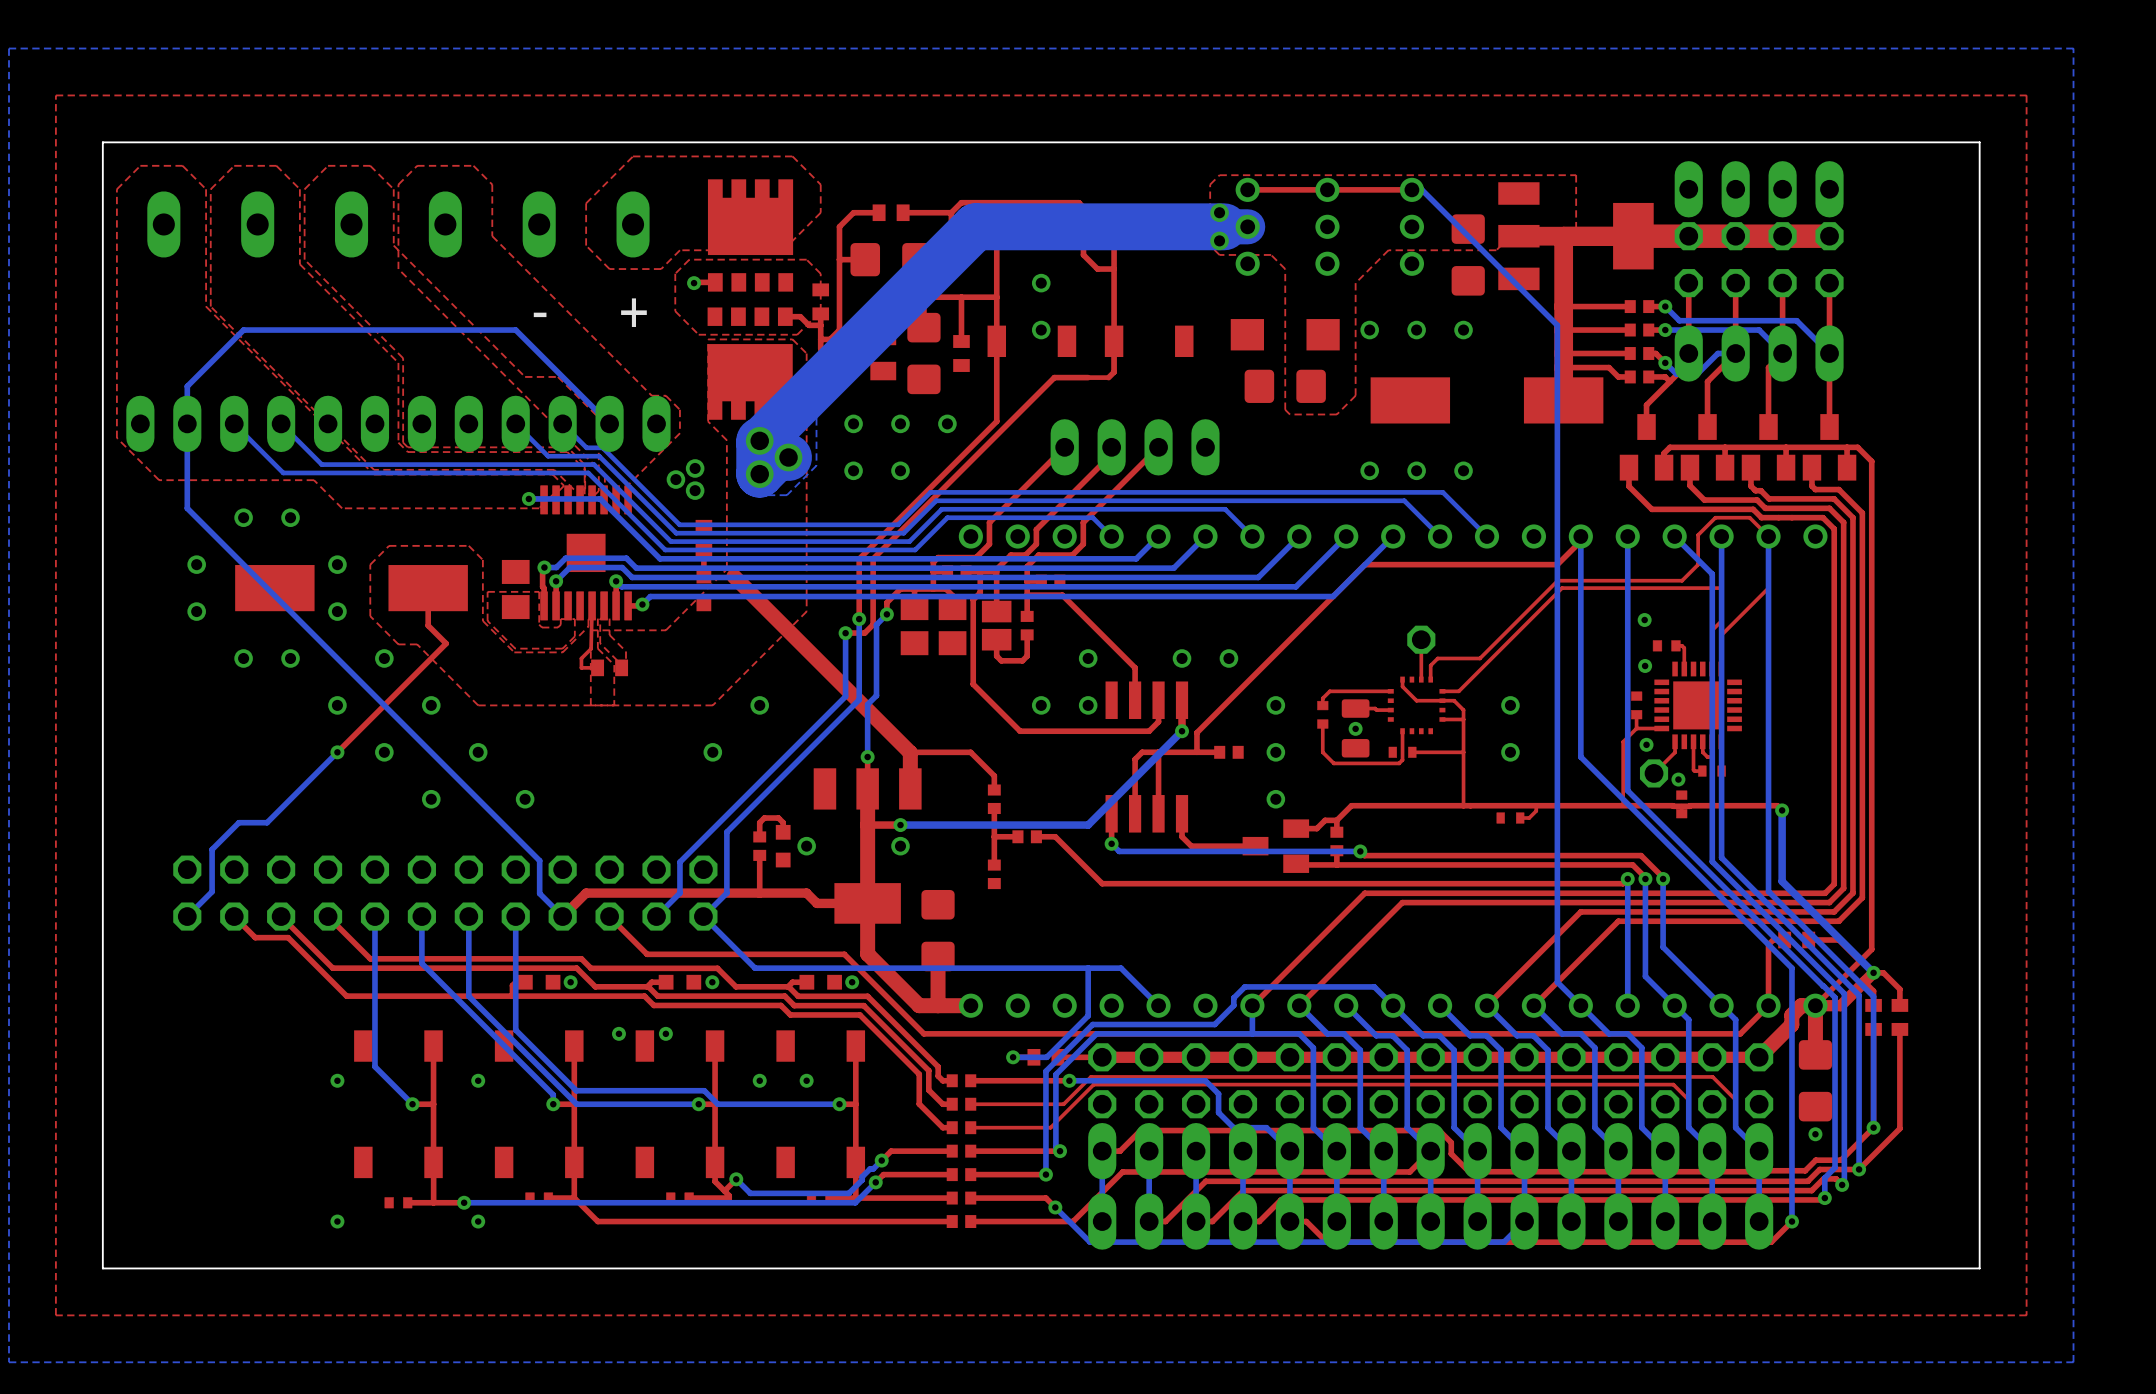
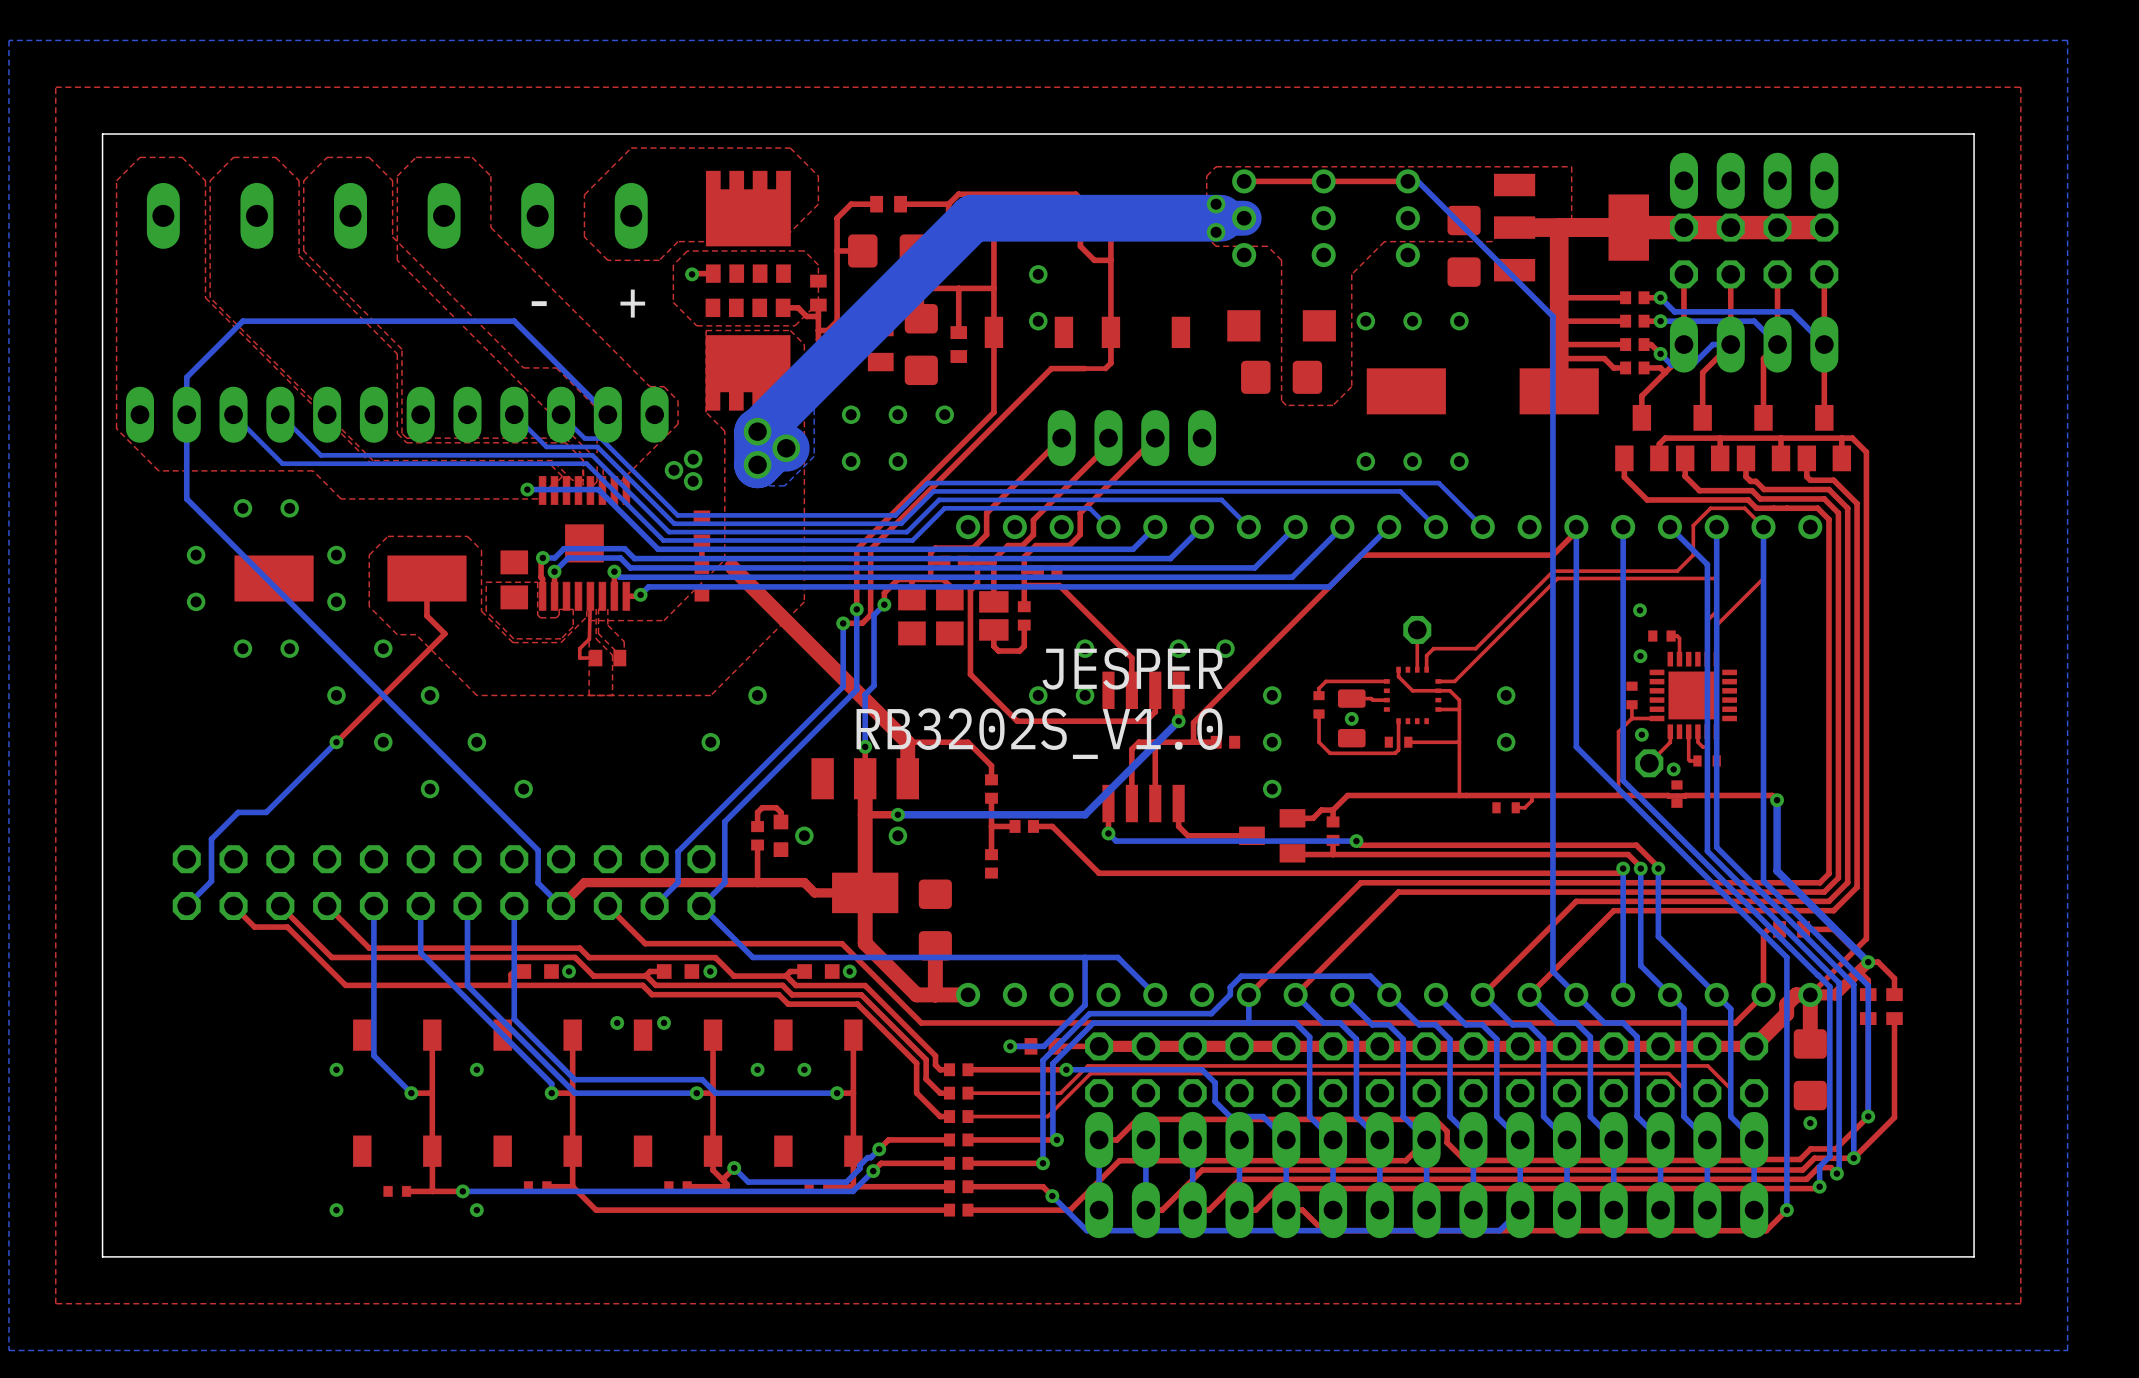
text: none -> JESPER (1132, 668)
text: none -> RB3202S_V1.0 (1039, 733)

